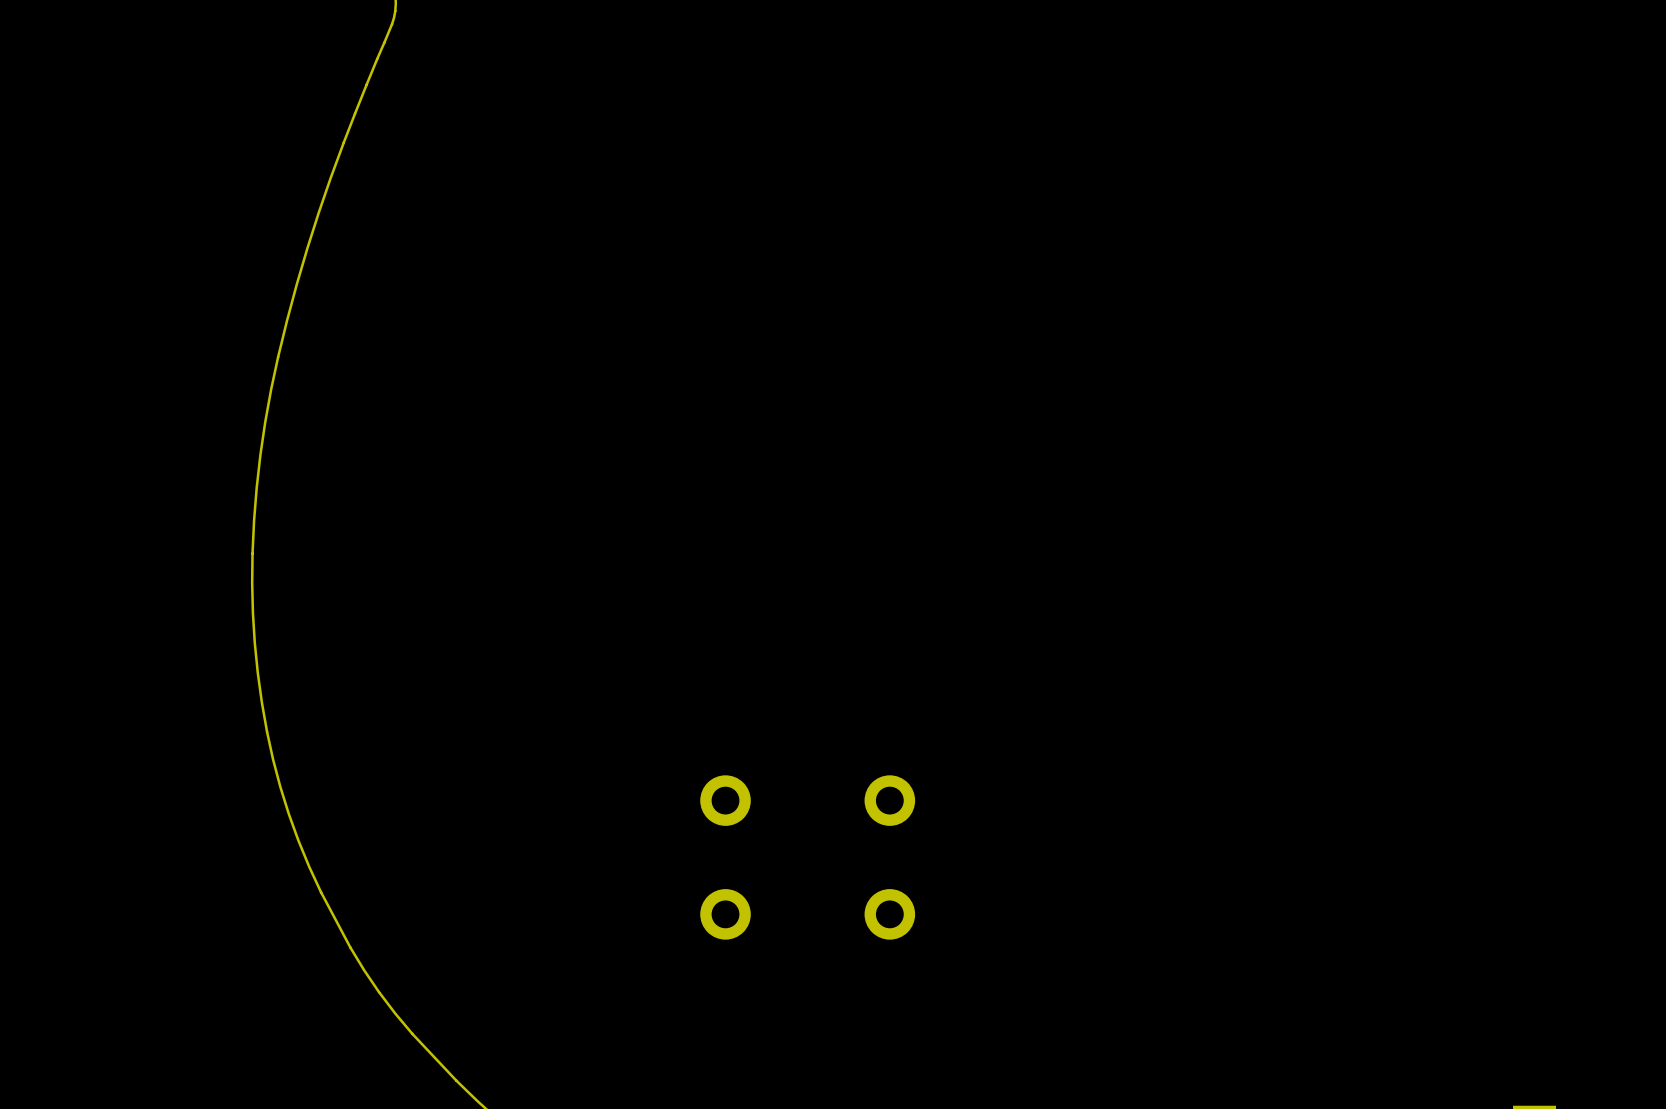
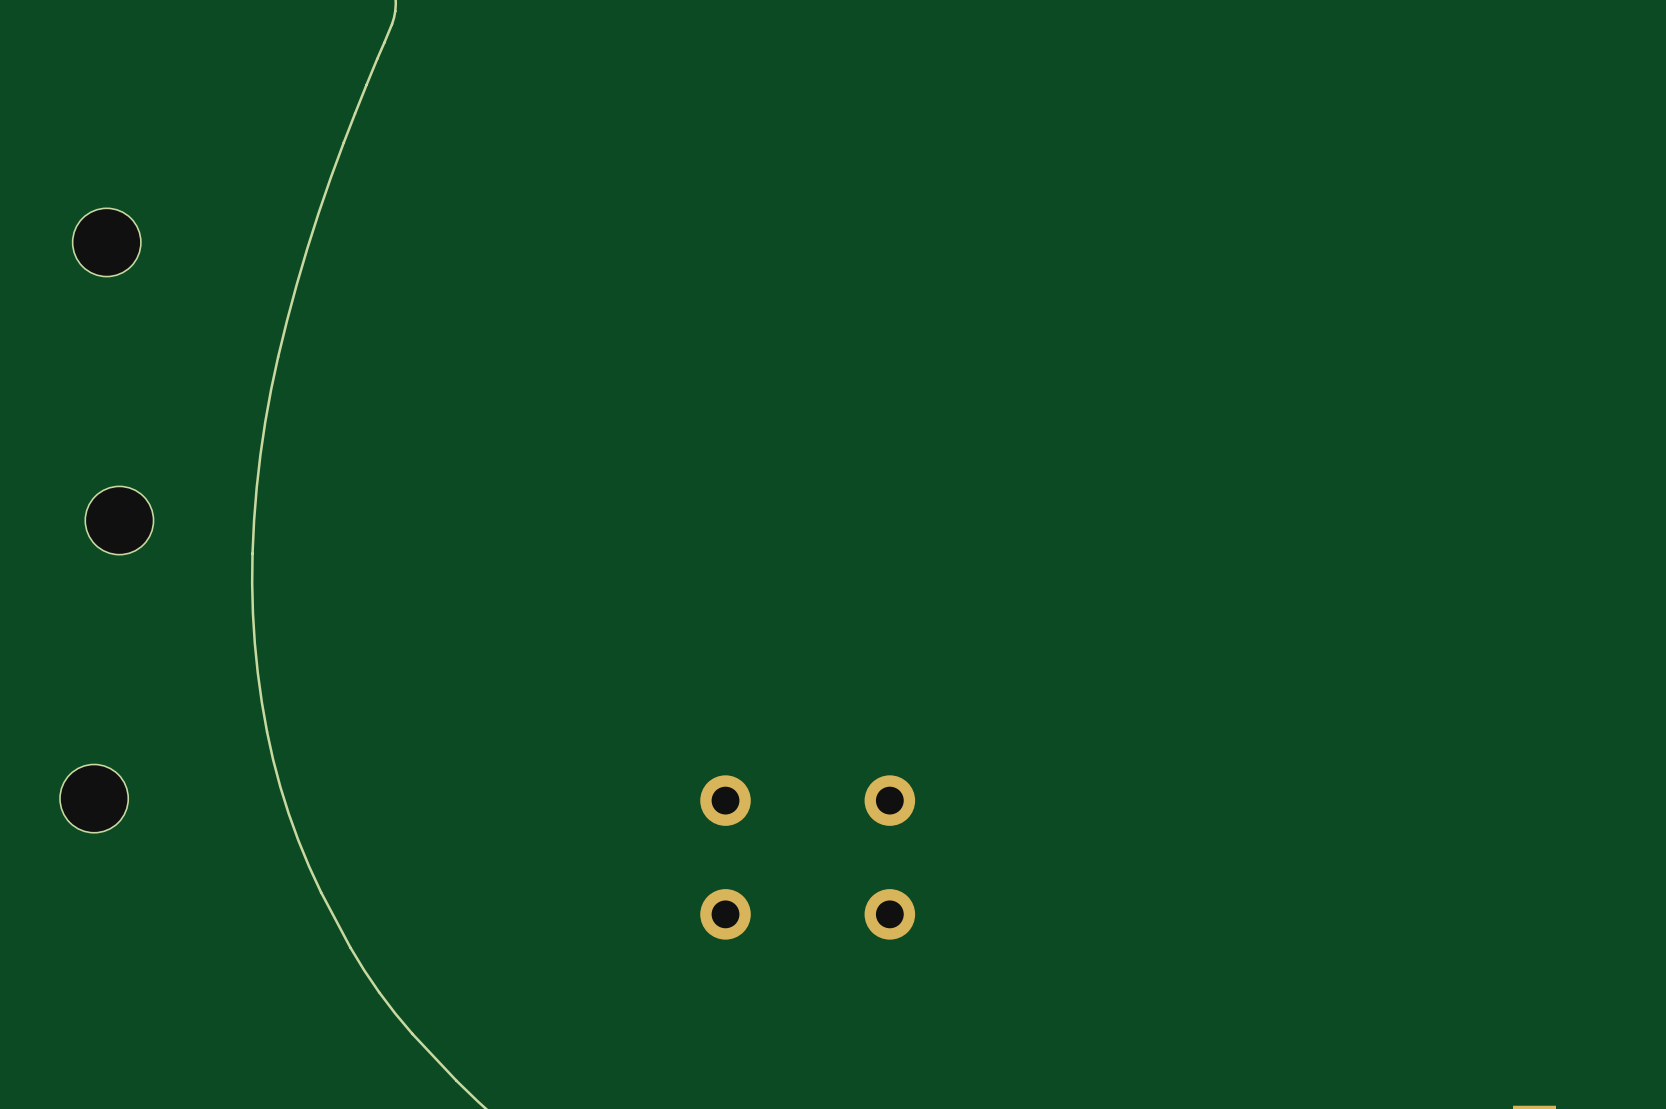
part: none -> (106, 242)
part: none -> (119, 520)
part: none -> (94, 798)

